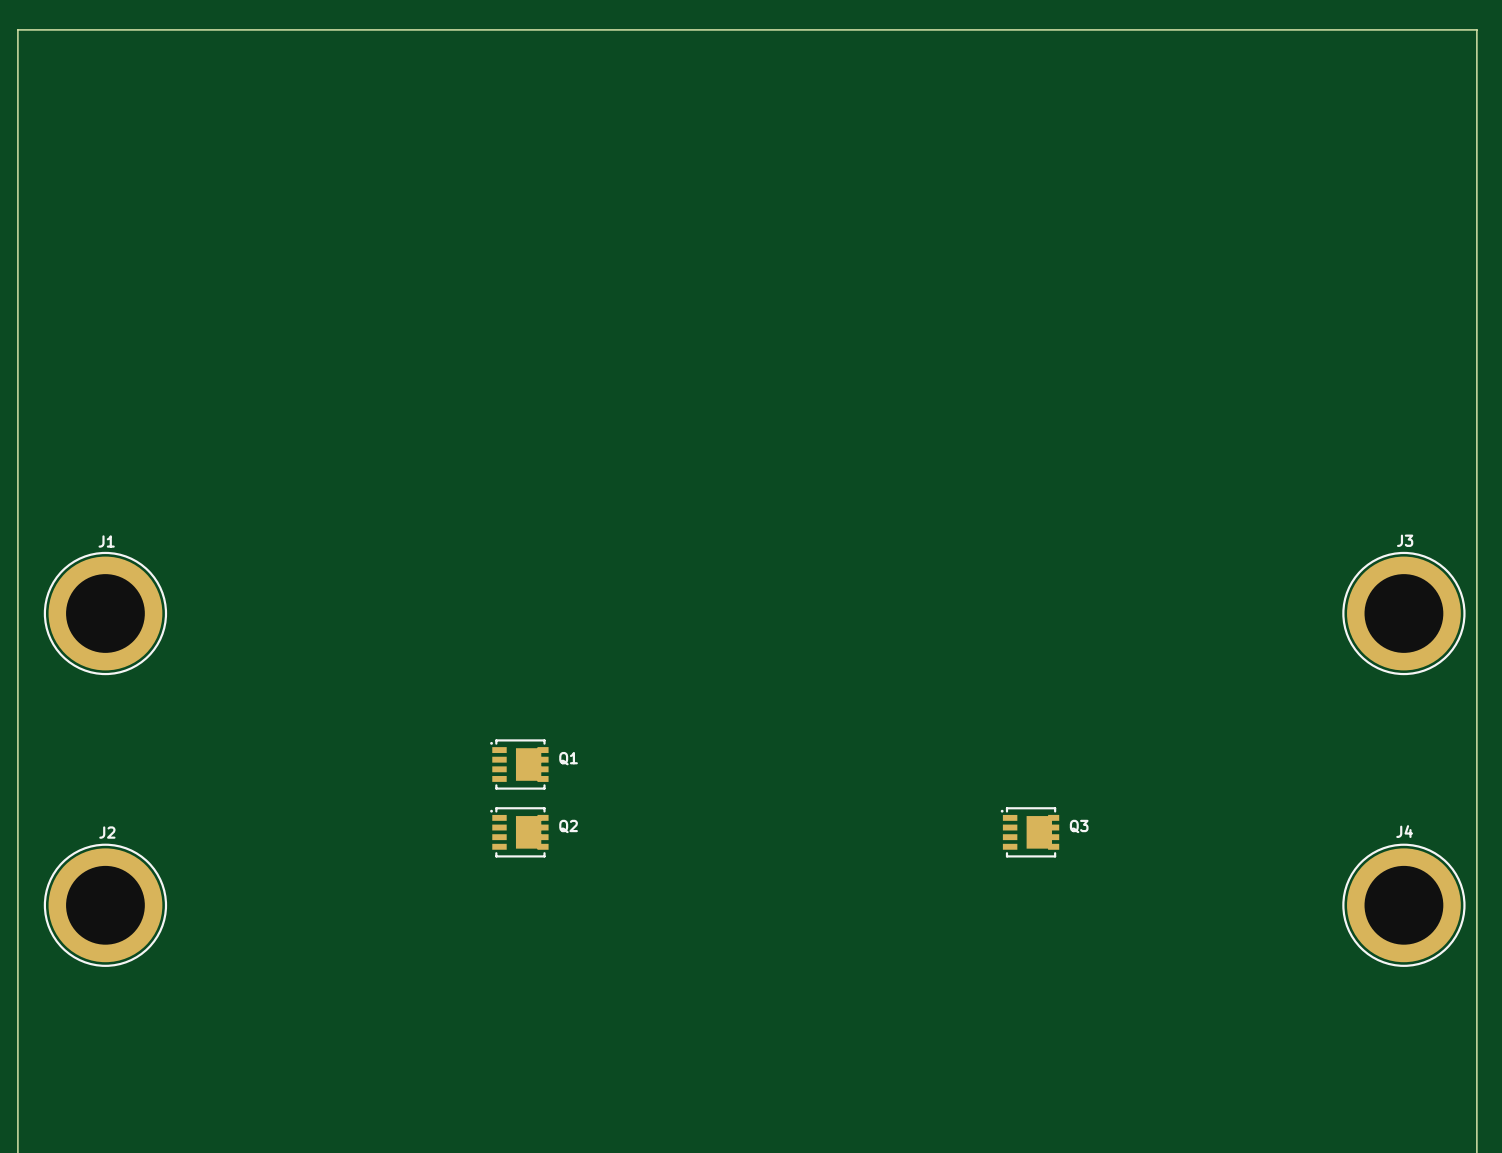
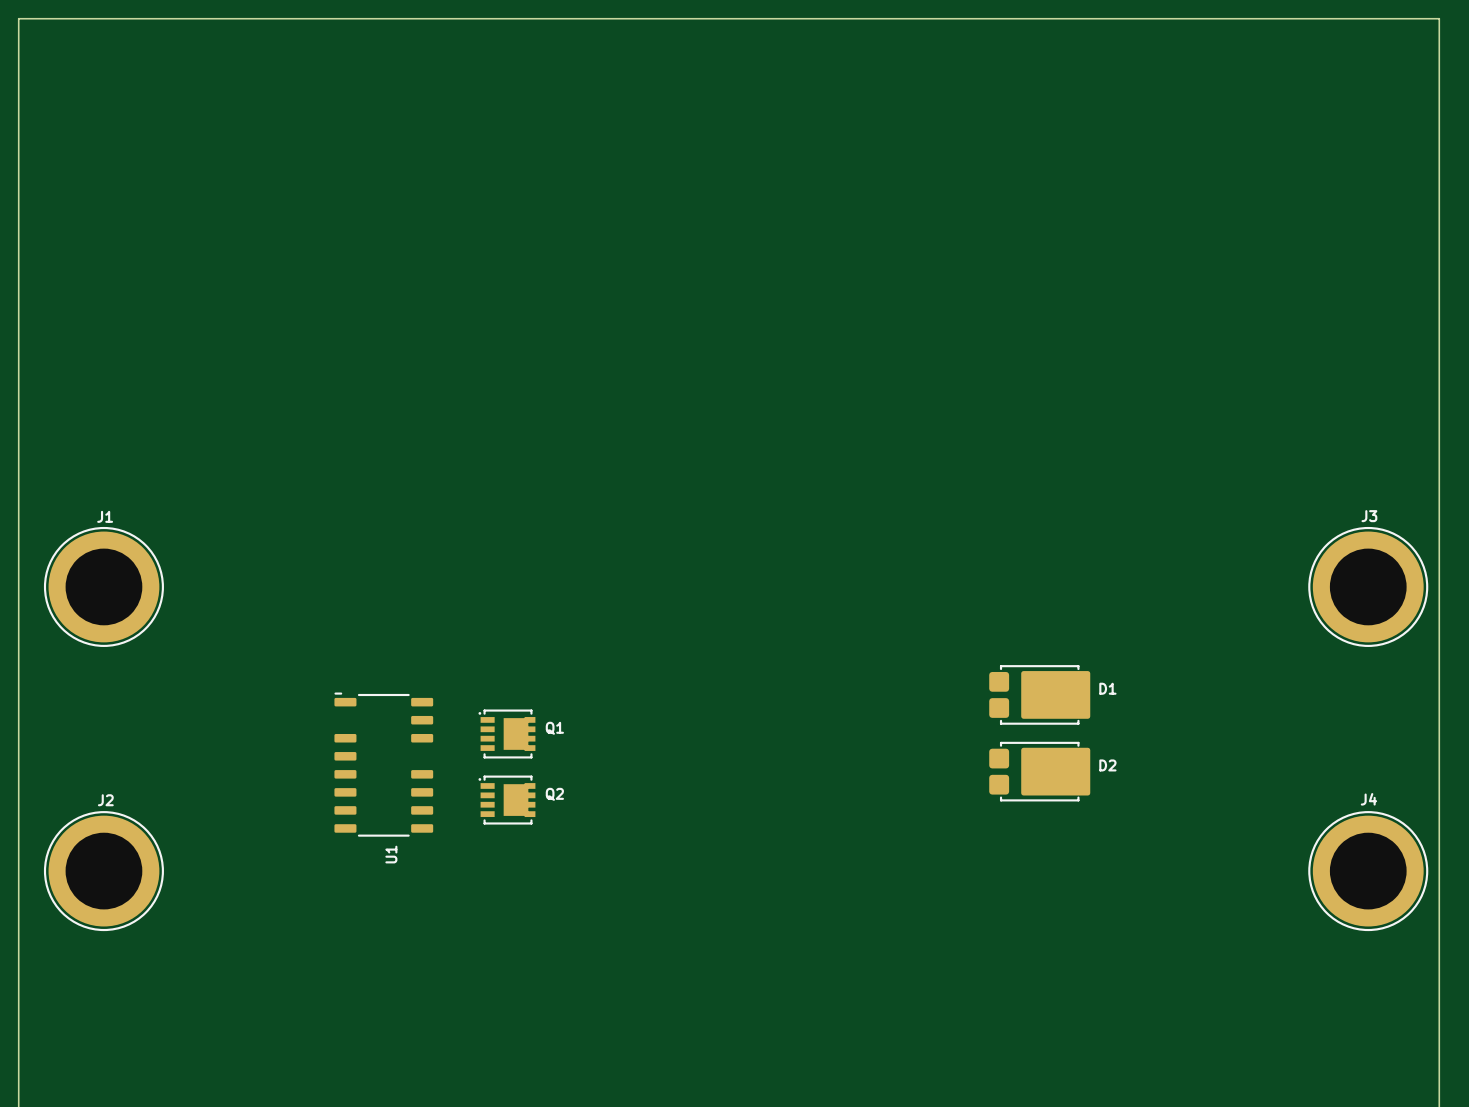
D1: none -> (1039, 694)
U1: none -> (383, 764)
D2: none -> (1039, 771)
Q3: (1029, 832) -> none

